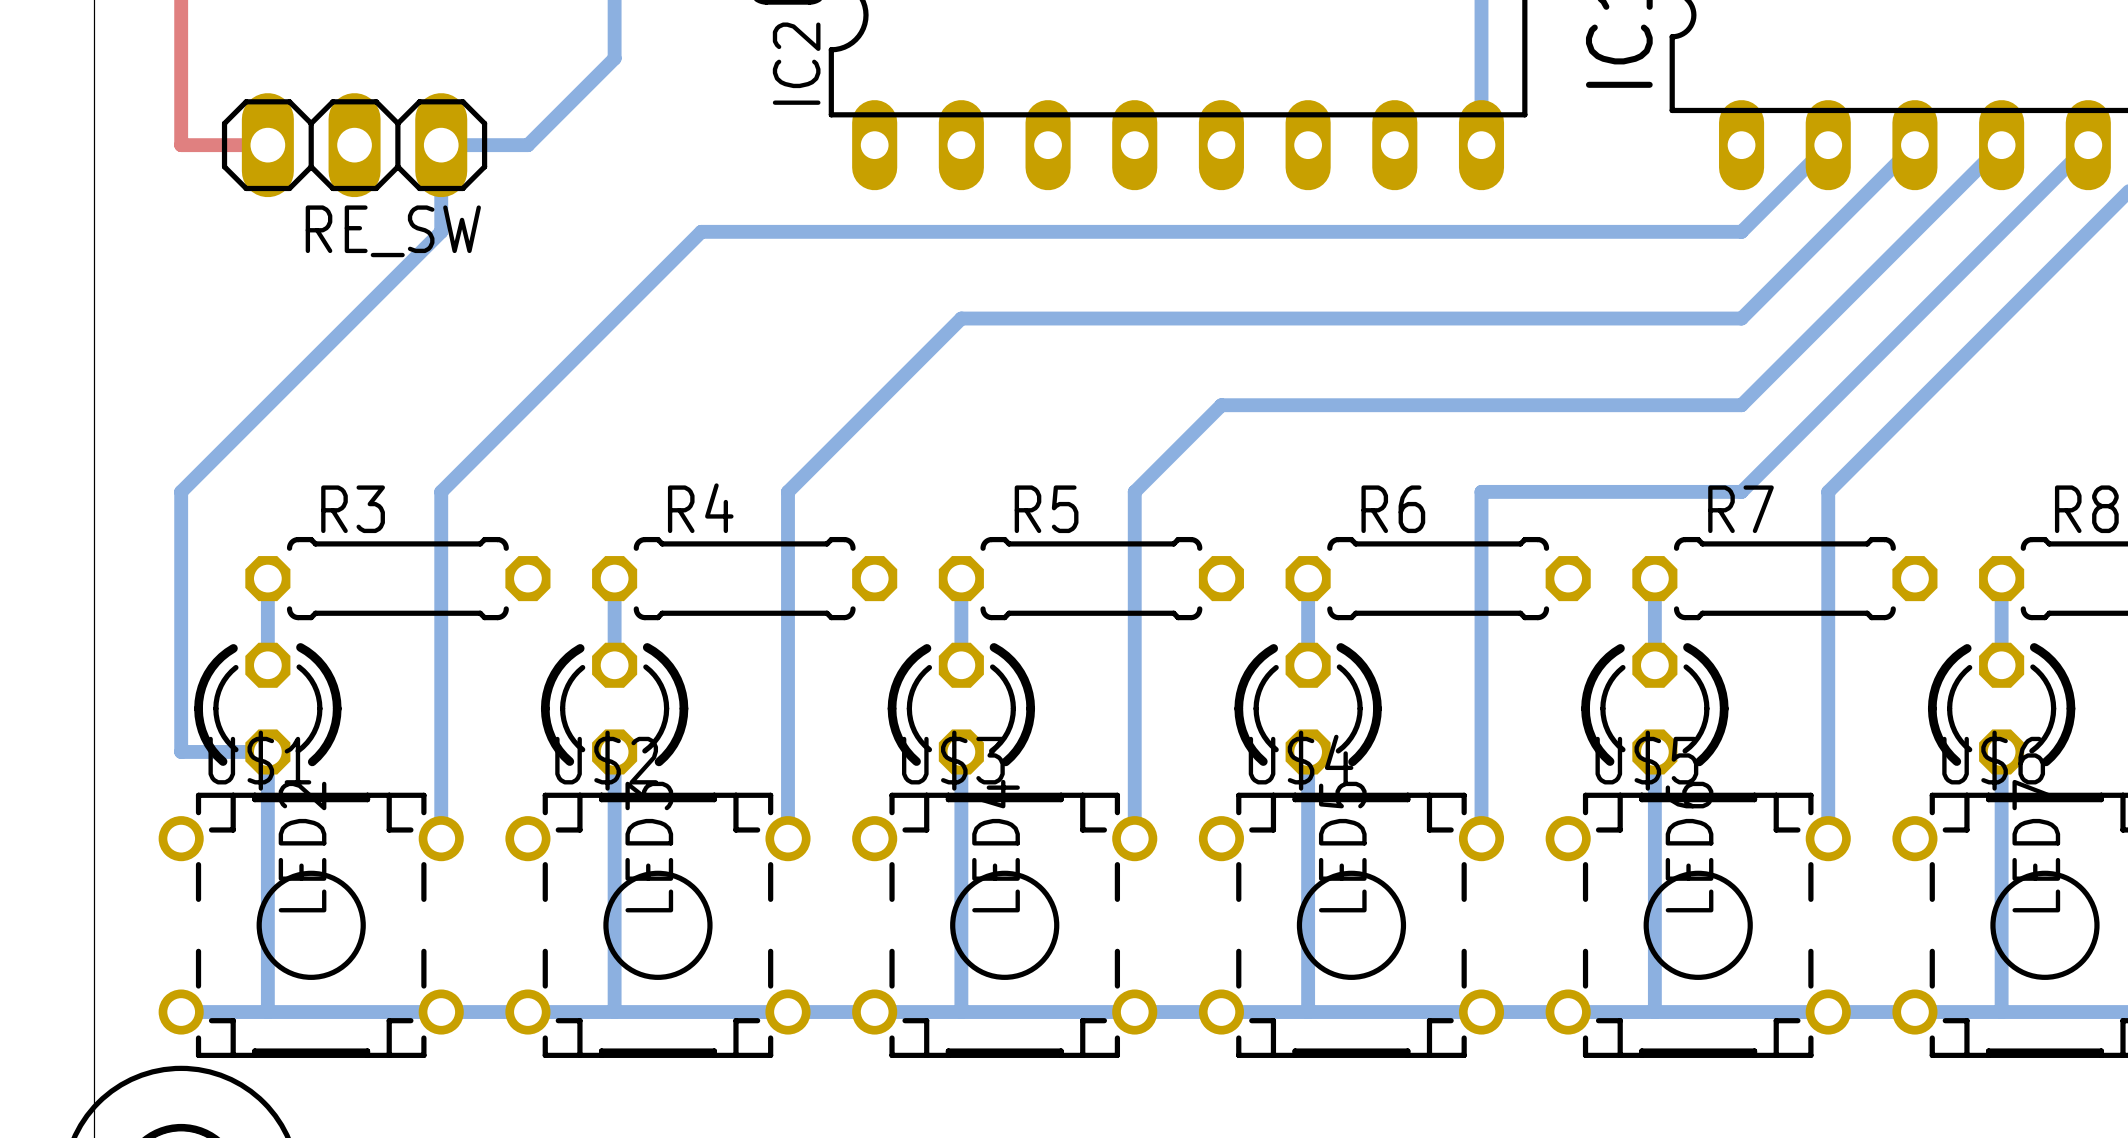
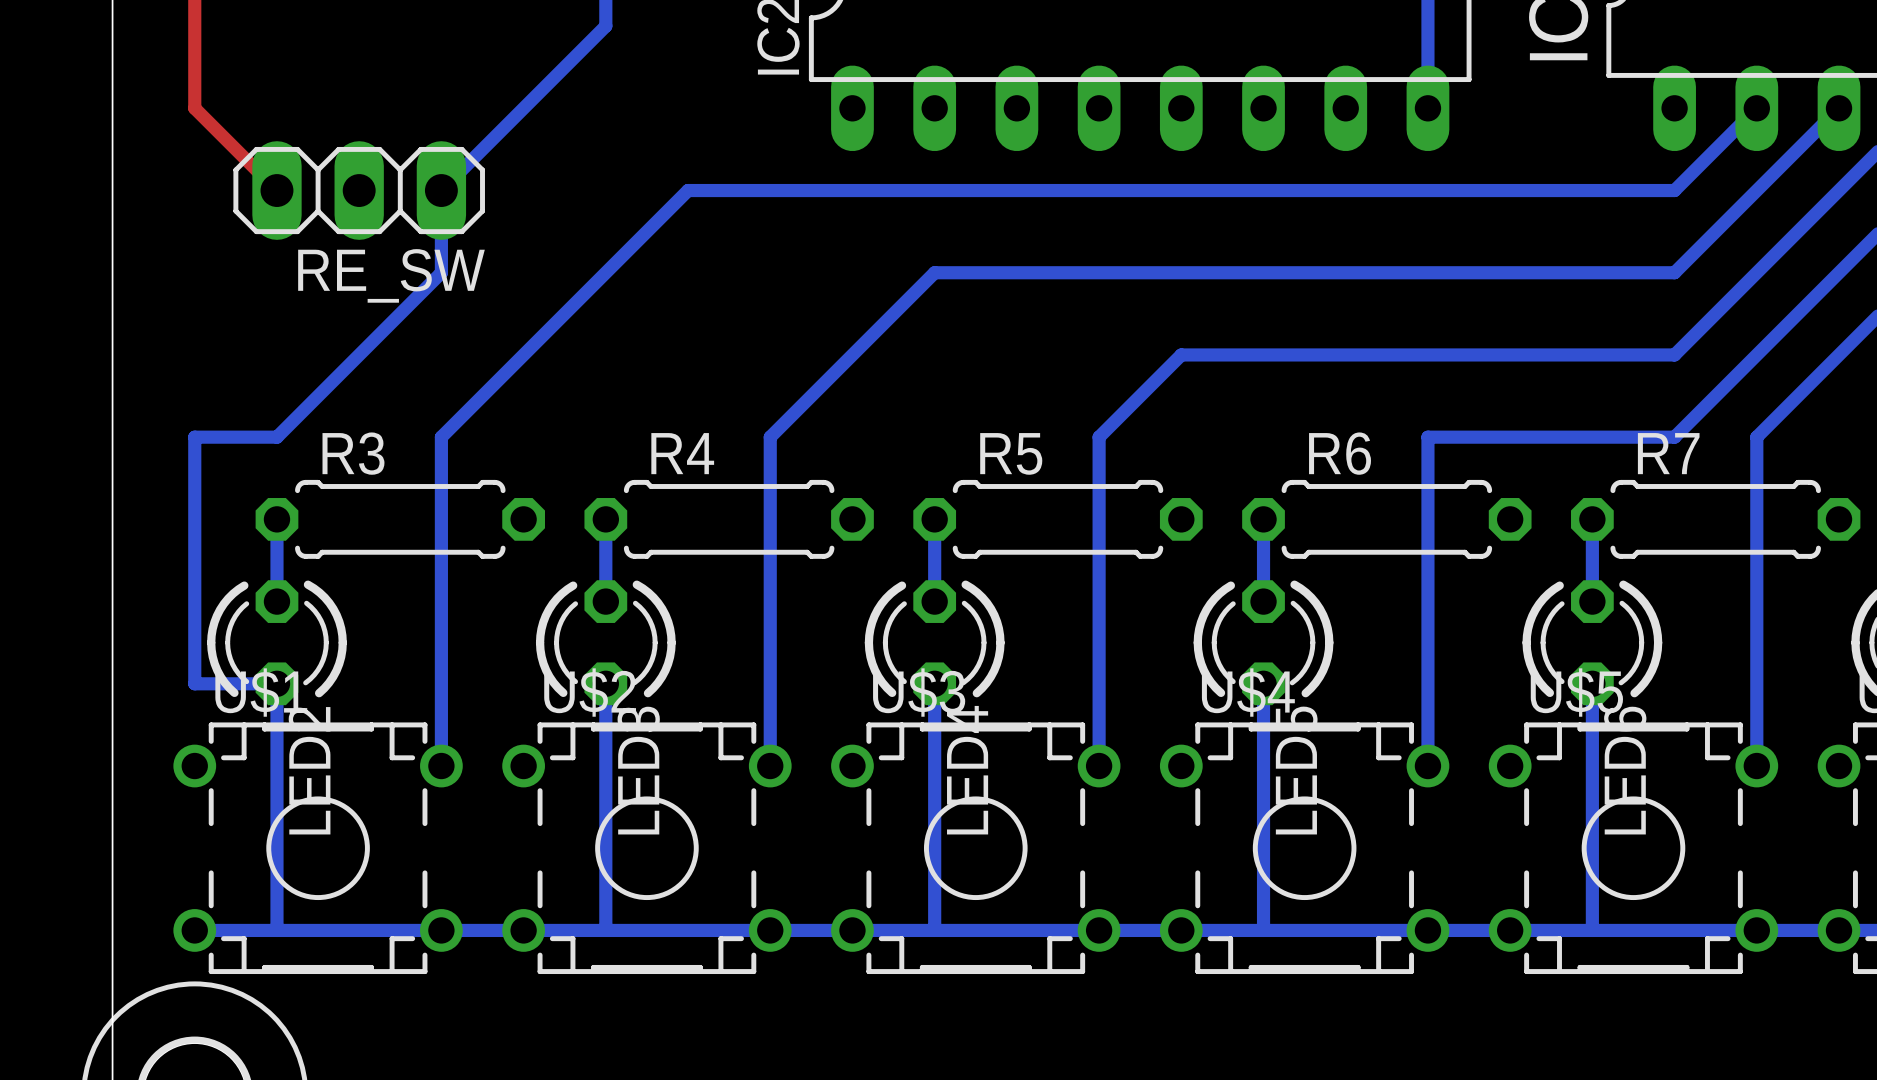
top track: (181, 145) (267, 145) -> (194, 108) (276, 190)
RE_SW position: (354, 145) -> (359, 190)
bottom track: (527, 145) (441, 145) (441, 231) (181, 491) -> (523, 108) (441, 190) (441, 272) (276, 437) (194, 437)

